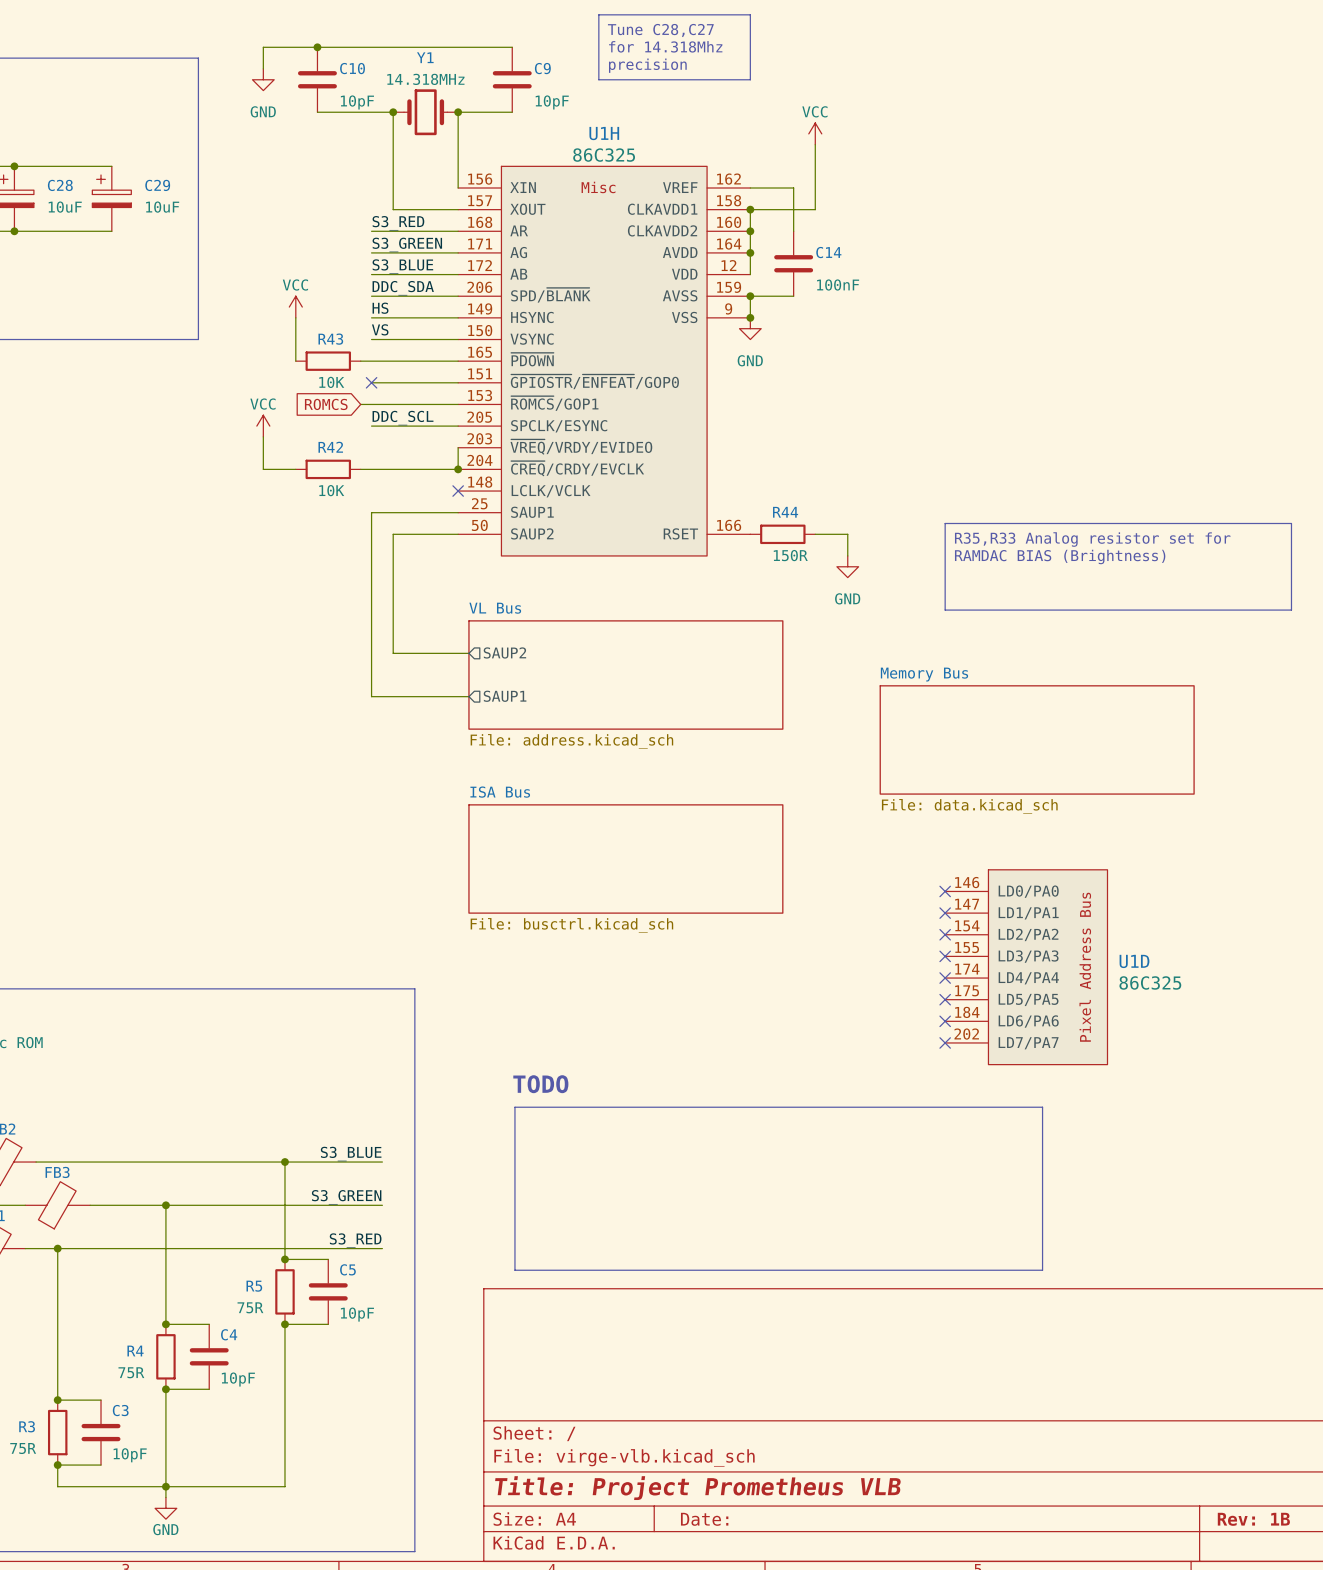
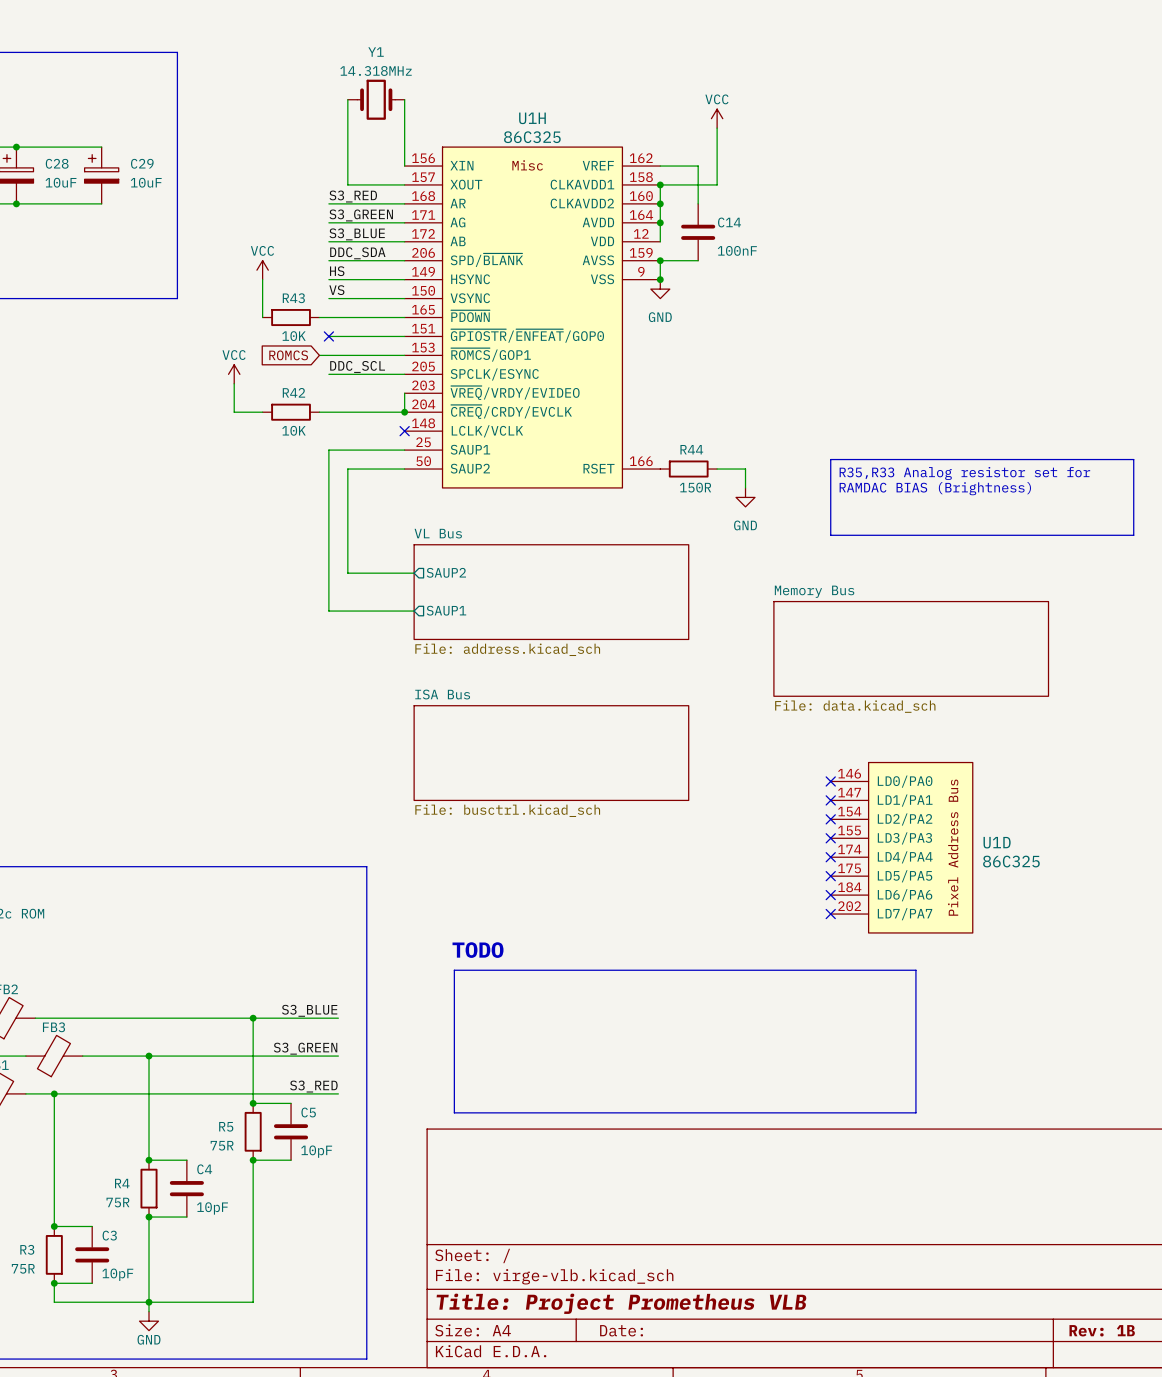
line: (598, 14) (750, 14) (750, 79) (598, 79) (598, 14) -> none
text: Tune C28,C27 (660, 30) -> none
text: for 14.318Mhz (665, 46) -> none
junction: (317, 47) -> none
wire: (512, 47) (263, 47) (263, 68) -> none
text: precision (647, 65) -> none
power symbol: GND (263, 79) -> none
C10: 10pF (317, 79) -> none
C9: 10pF (512, 79) -> none
wire: (317, 112) (393, 112) -> none
junction: (393, 112) -> none
wire: (458, 112) (512, 112) -> none
junction: (458, 112) -> none

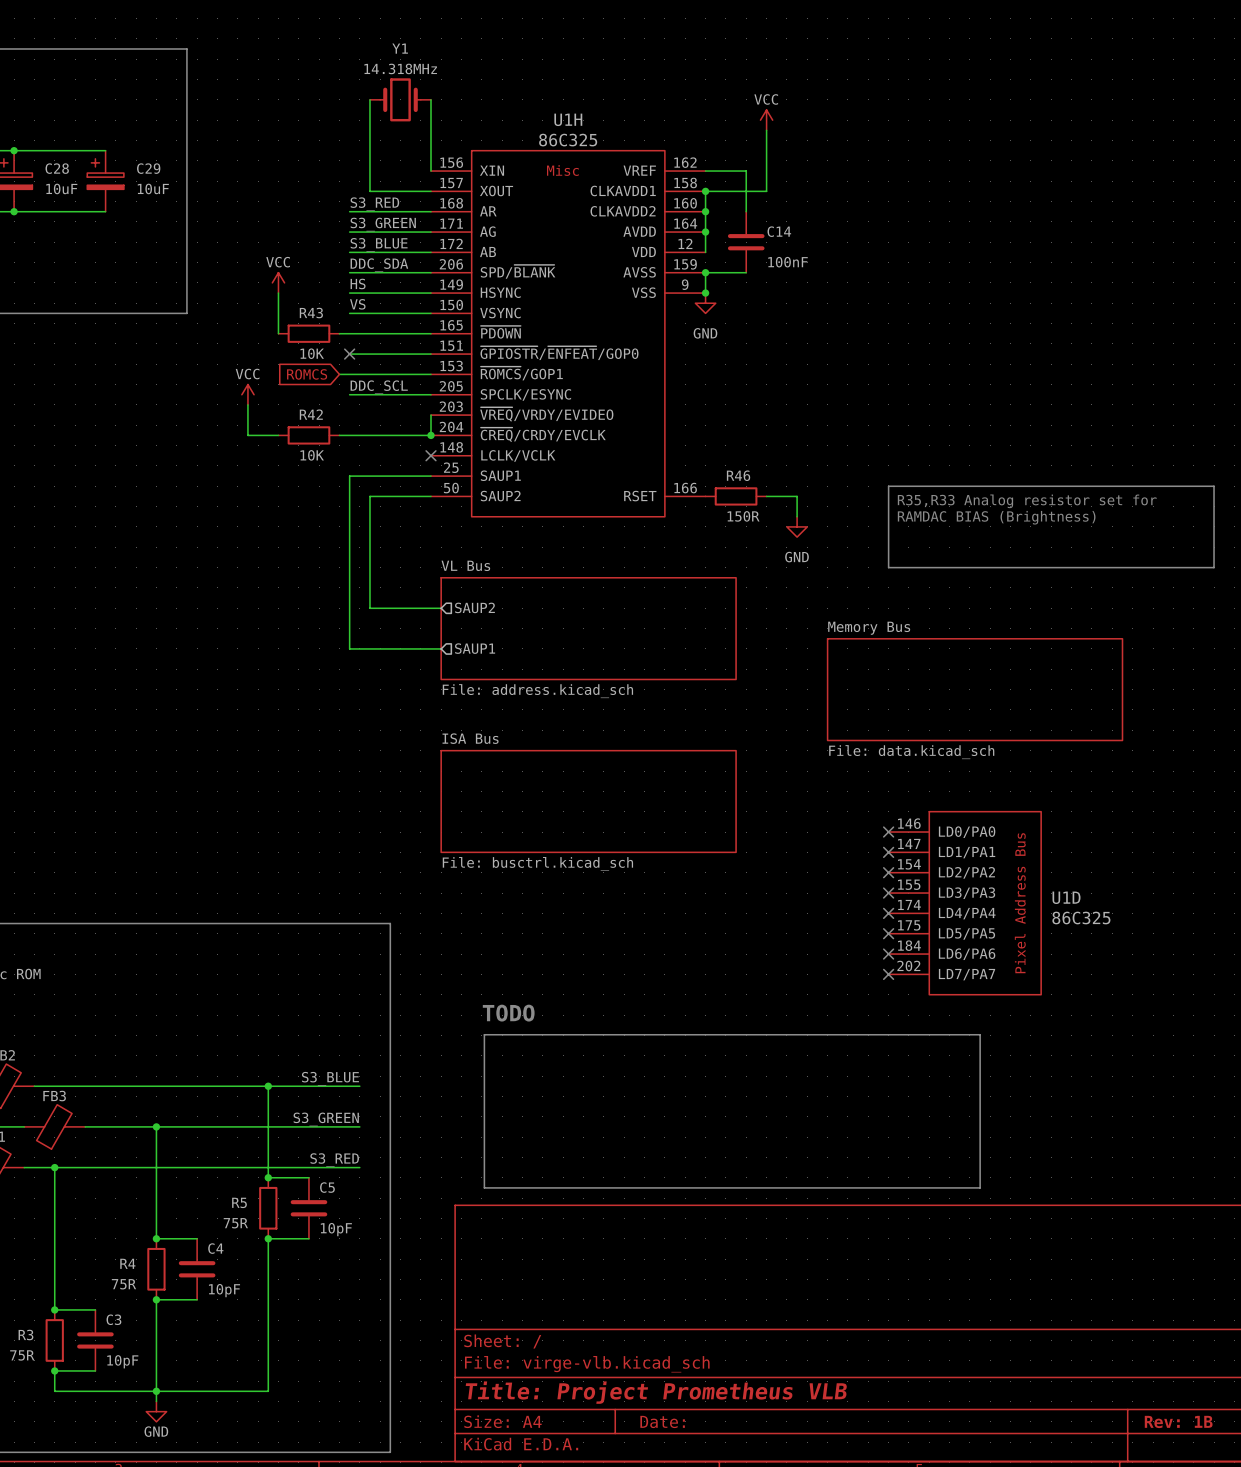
R44 name: R44 (691, 449) -> R46 (738, 475)

